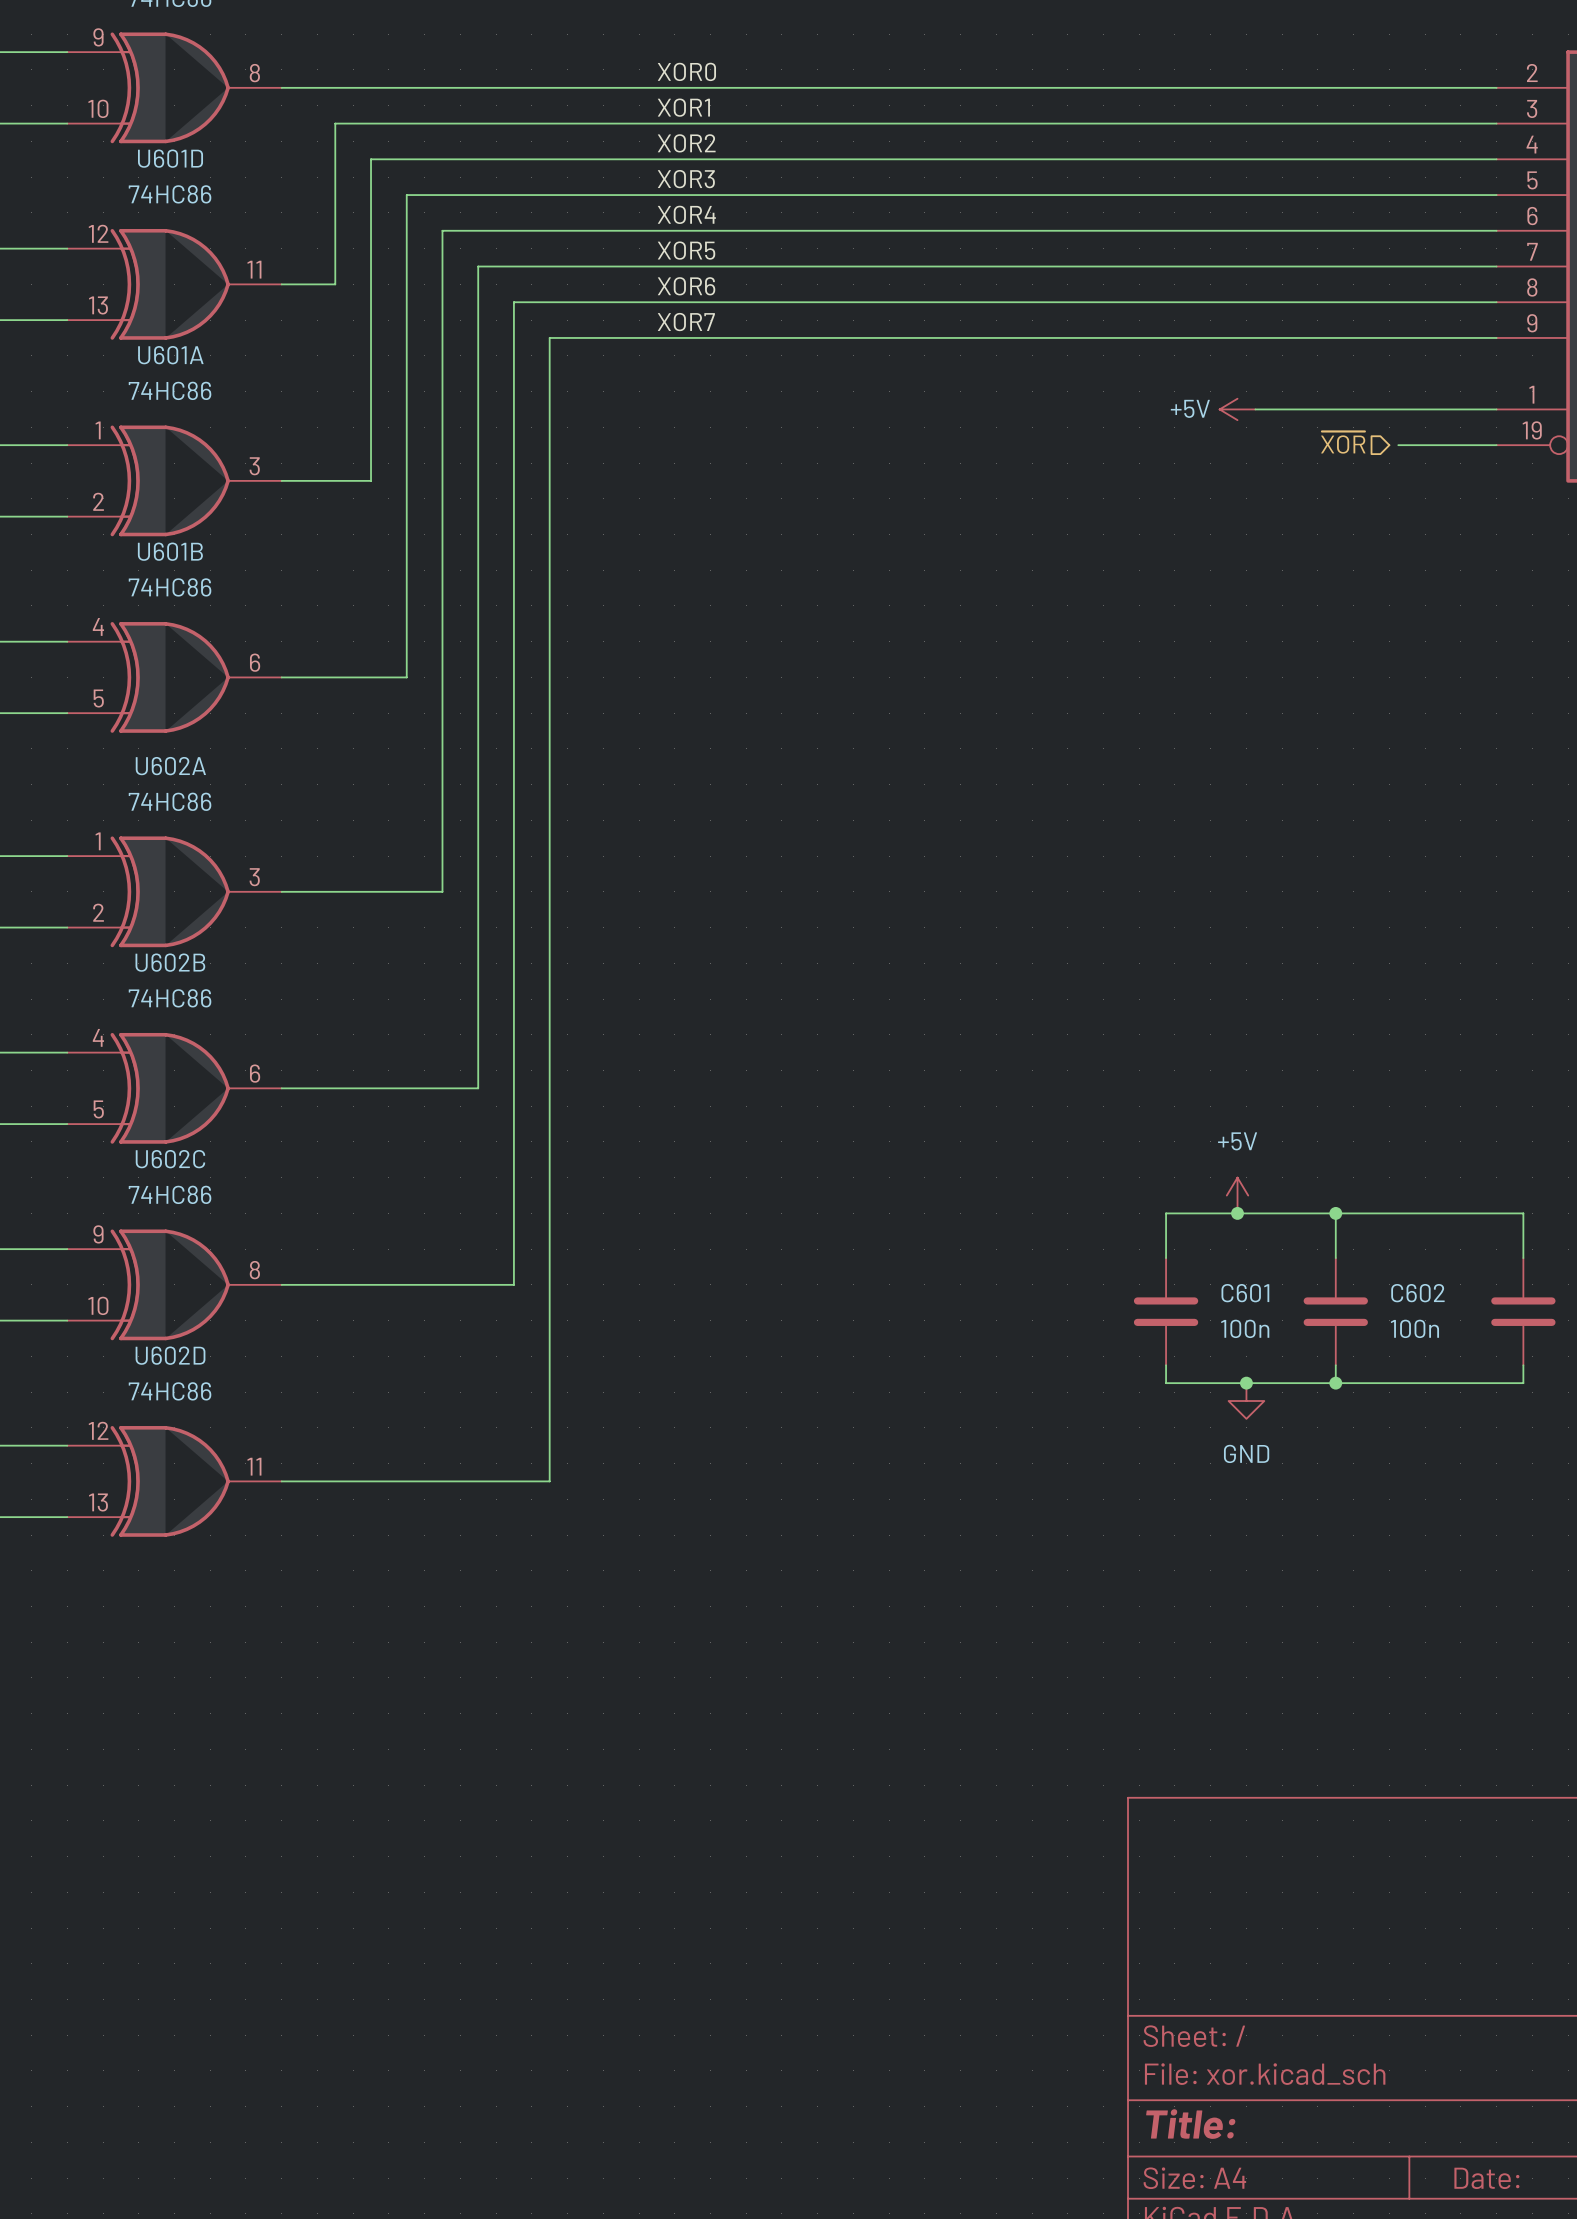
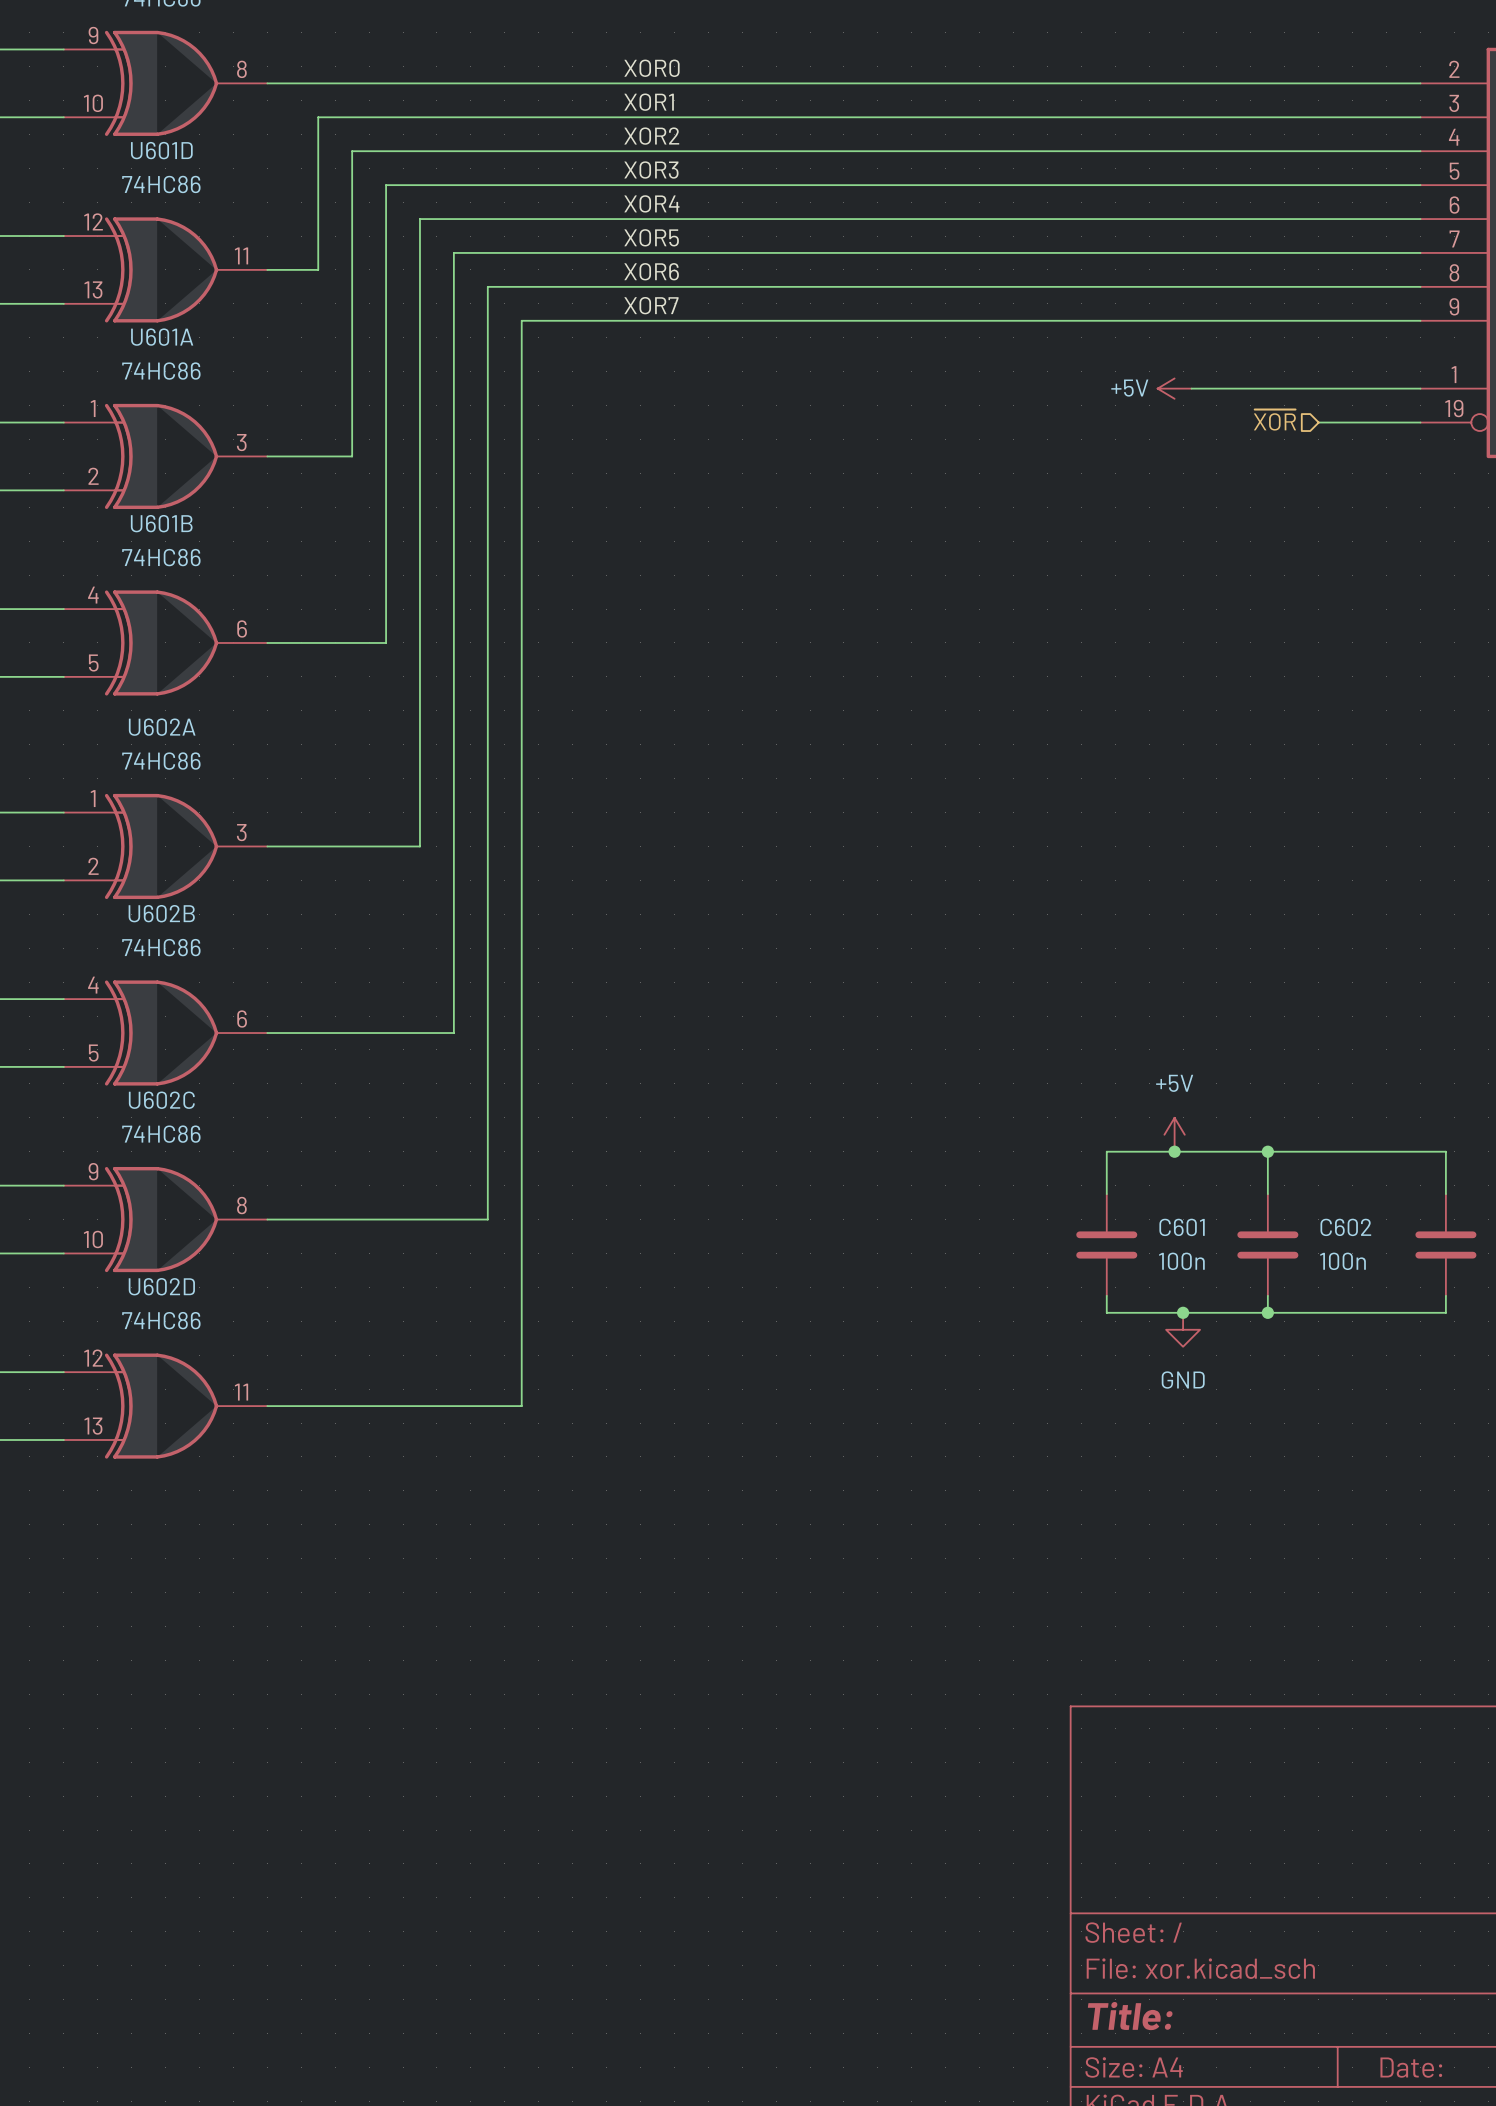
wire: none -> (1318, 422) (1327, 422)

